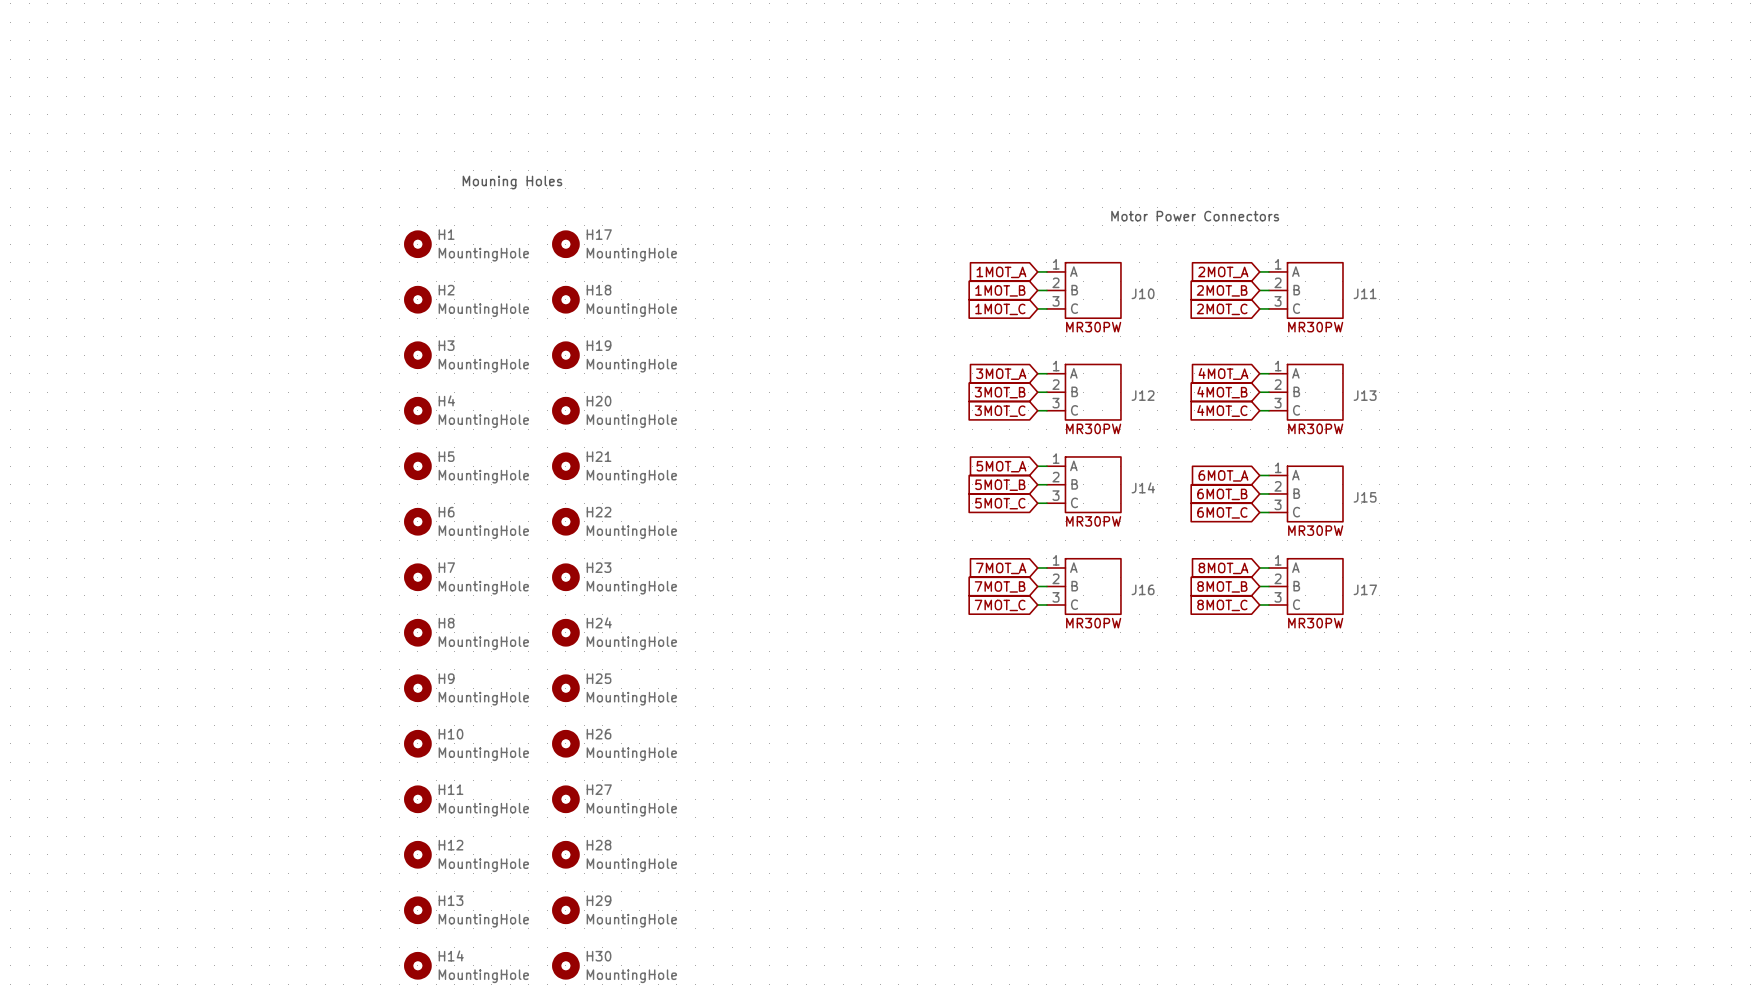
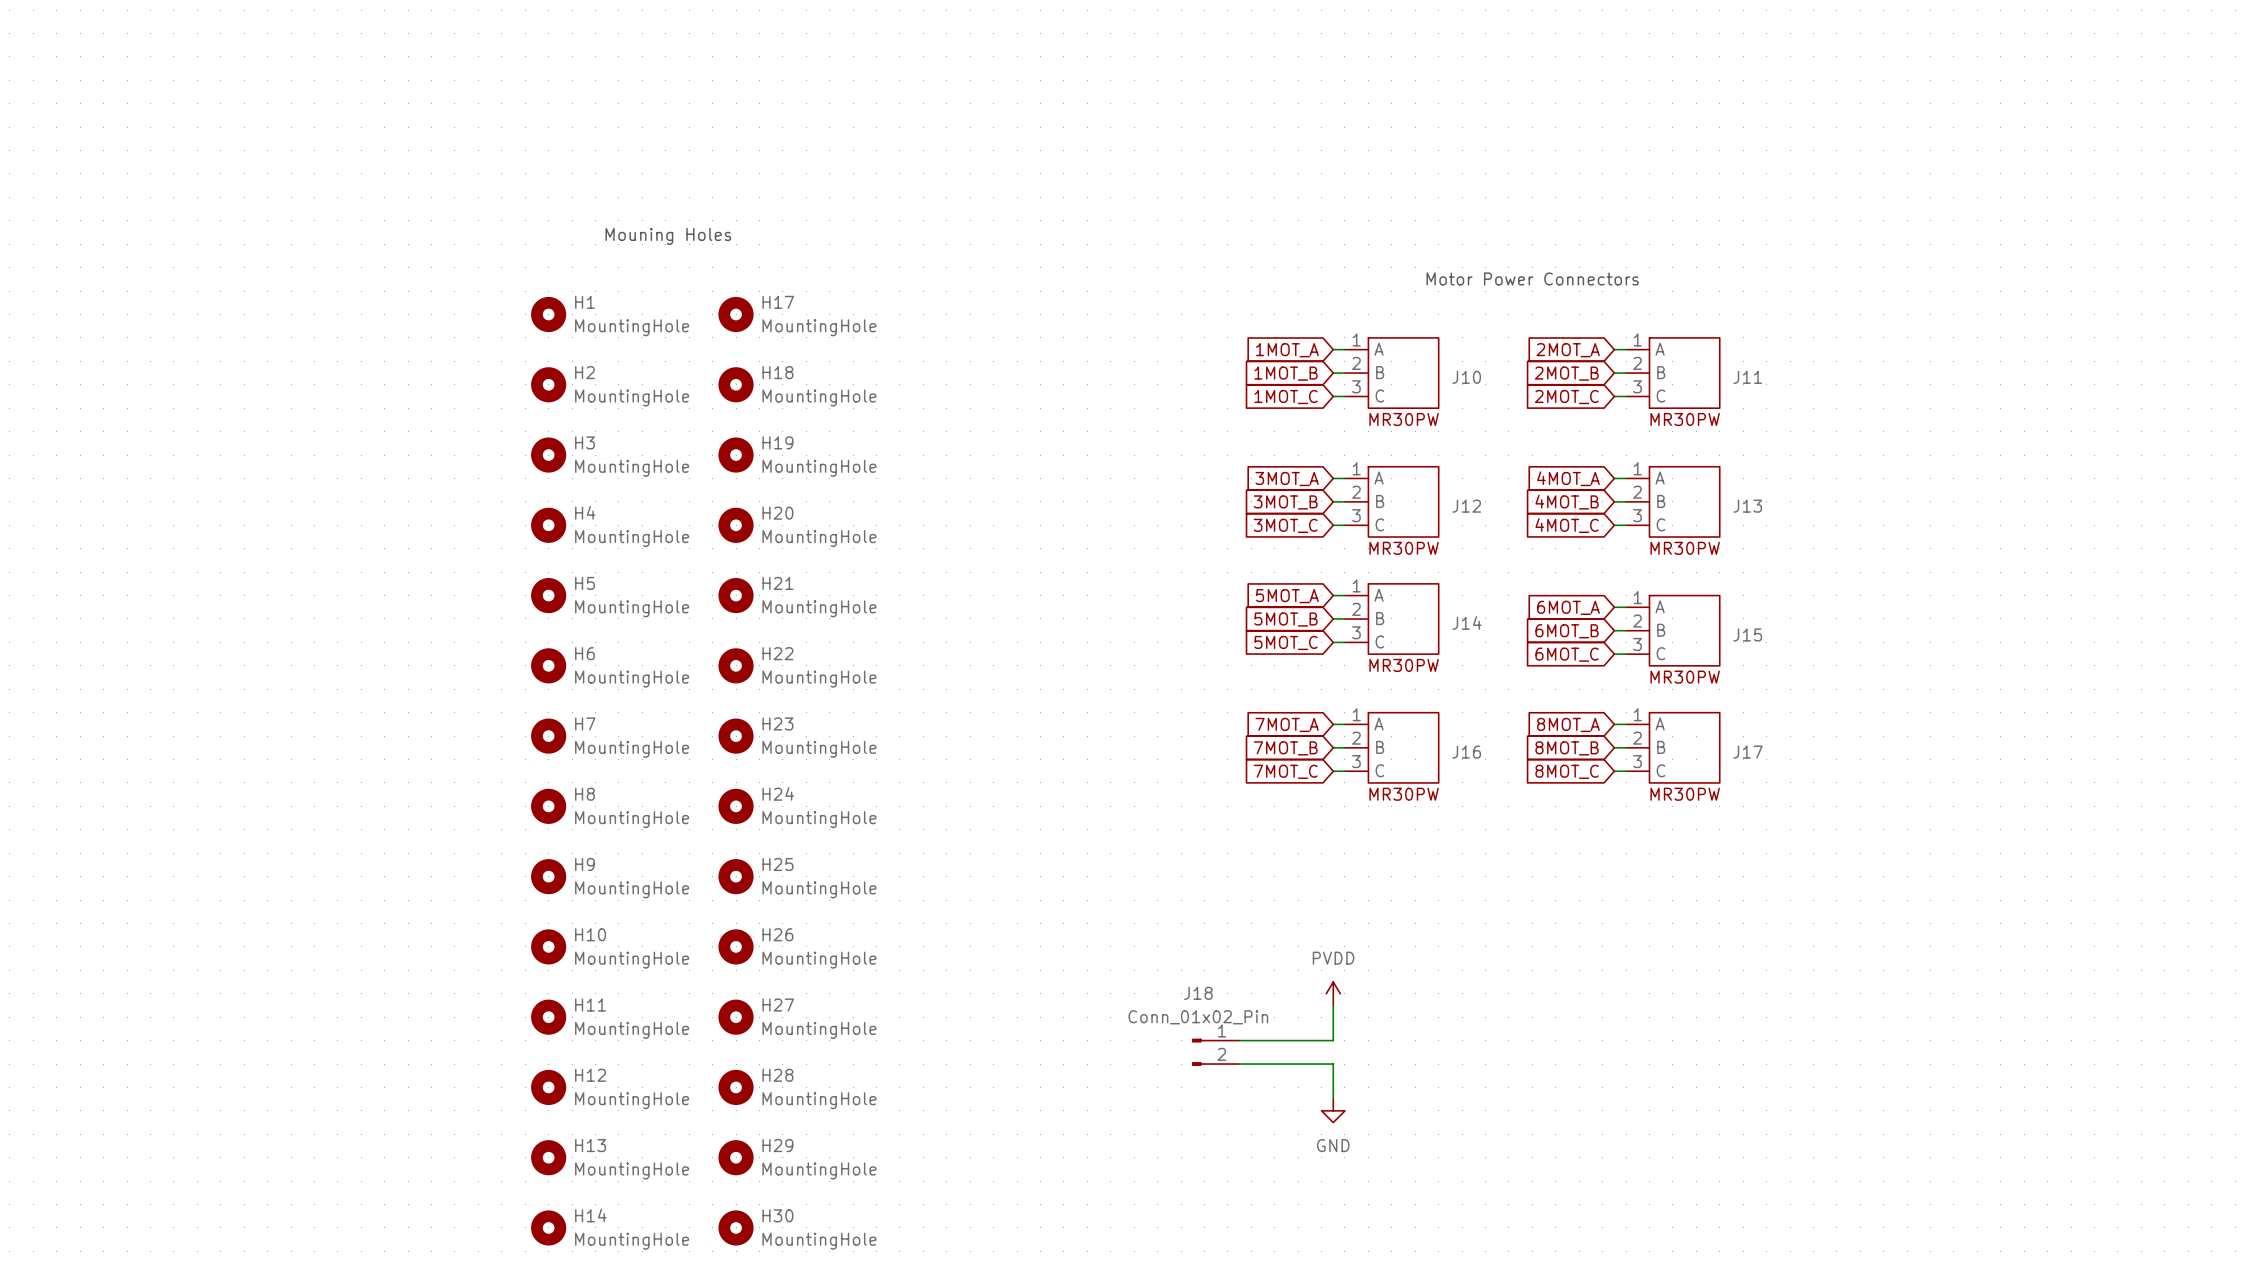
power symbol: none -> PVDD (1333, 993)
wire: none -> (1333, 1005) (1333, 1040) (1239, 1040)
J18: none -> Conn_01x02_Pin (1215, 1052)
wire: none -> (1239, 1064) (1333, 1064) (1333, 1099)
power symbol: none -> GND (1333, 1110)

